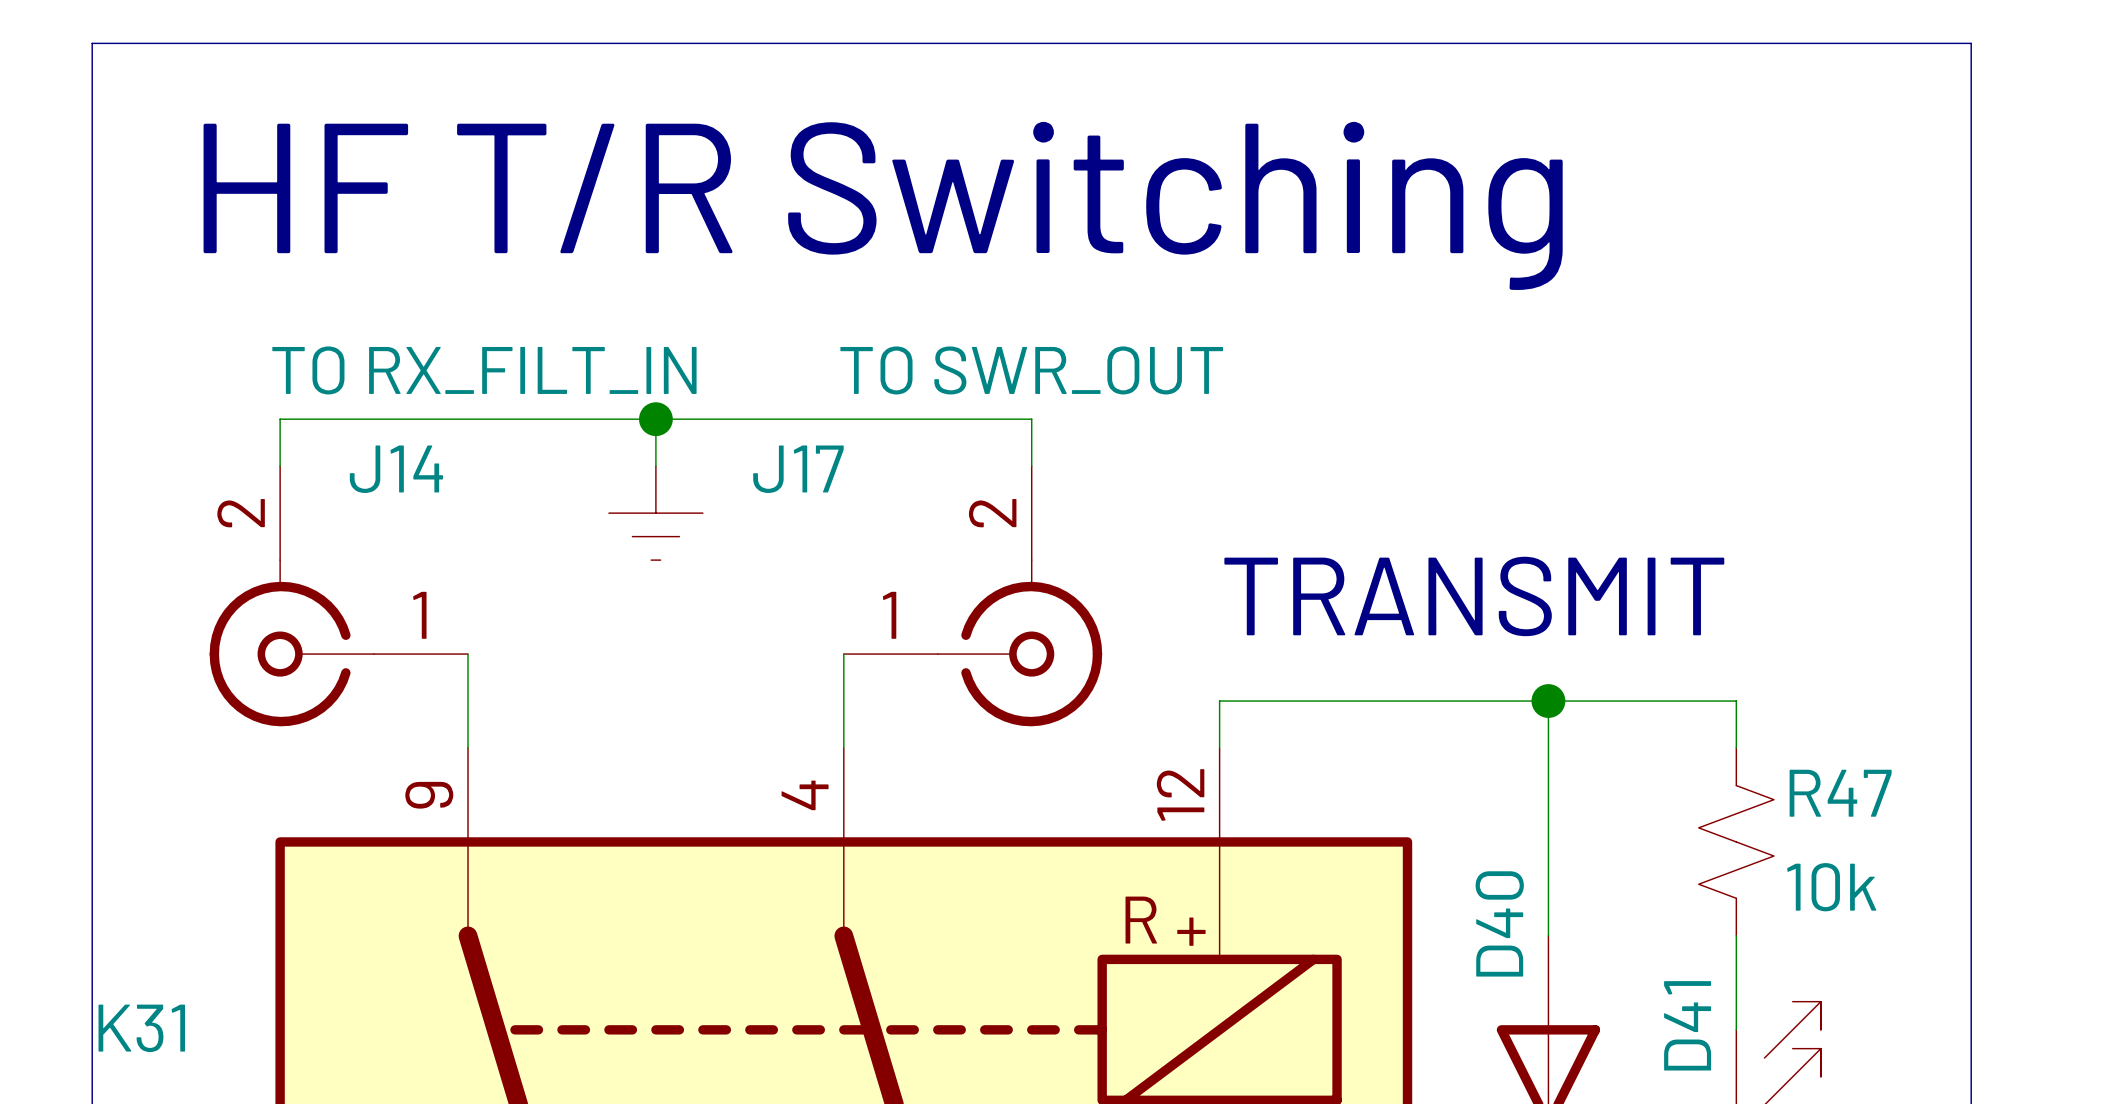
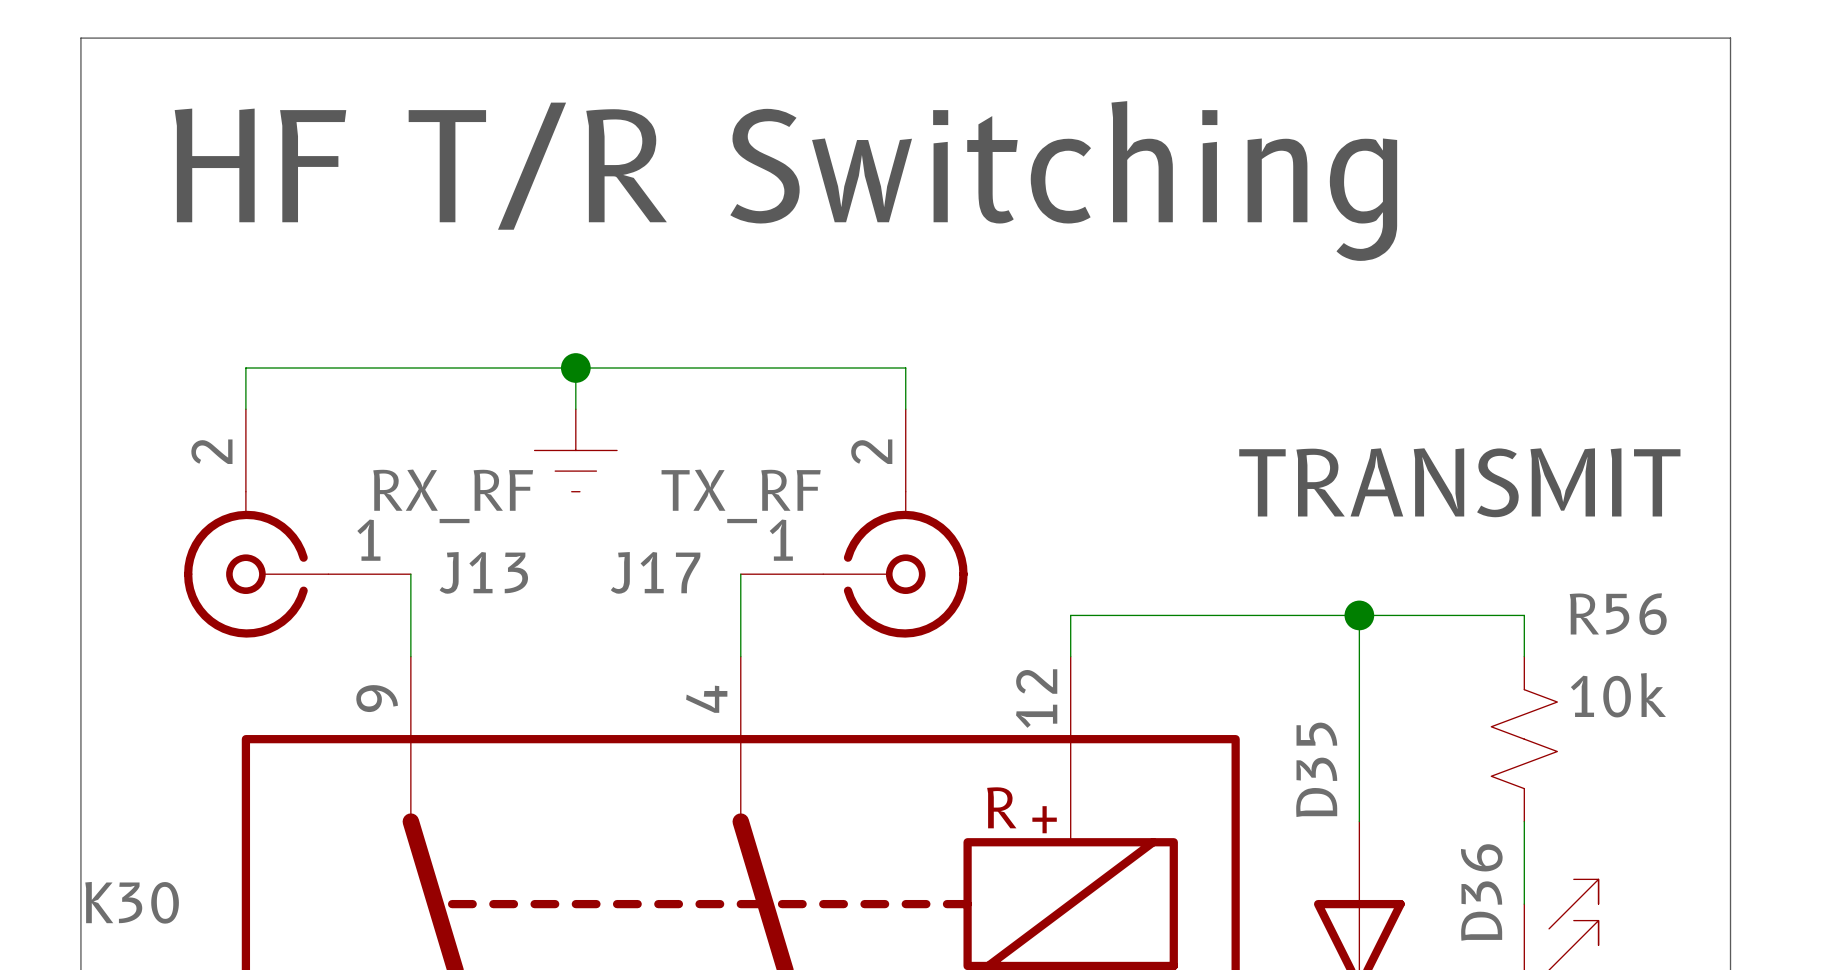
J14 value: TO RX_FILT_IN (484, 370) -> RX_RF (453, 496)
J17 value: TO SWR_OUT (1031, 370) -> TX_RF (741, 496)
J14 name: J14 (396, 469) -> J13 (483, 572)
J17 name position: J17 (798, 469) -> J17 (655, 572)
text position: TRANSMIT (1474, 596) -> TRANSMIT (1459, 482)
R47 name: R47 (1840, 793) -> R56 (1618, 614)
R47 value position: 10k (1831, 887) -> 10k (1618, 695)
D40 name: D40 (1499, 923) -> D35 (1316, 769)
D41 name: D41 (1687, 1025) -> D36 (1481, 892)
K31 name: K31 (141, 1028) -> K30 (132, 902)

